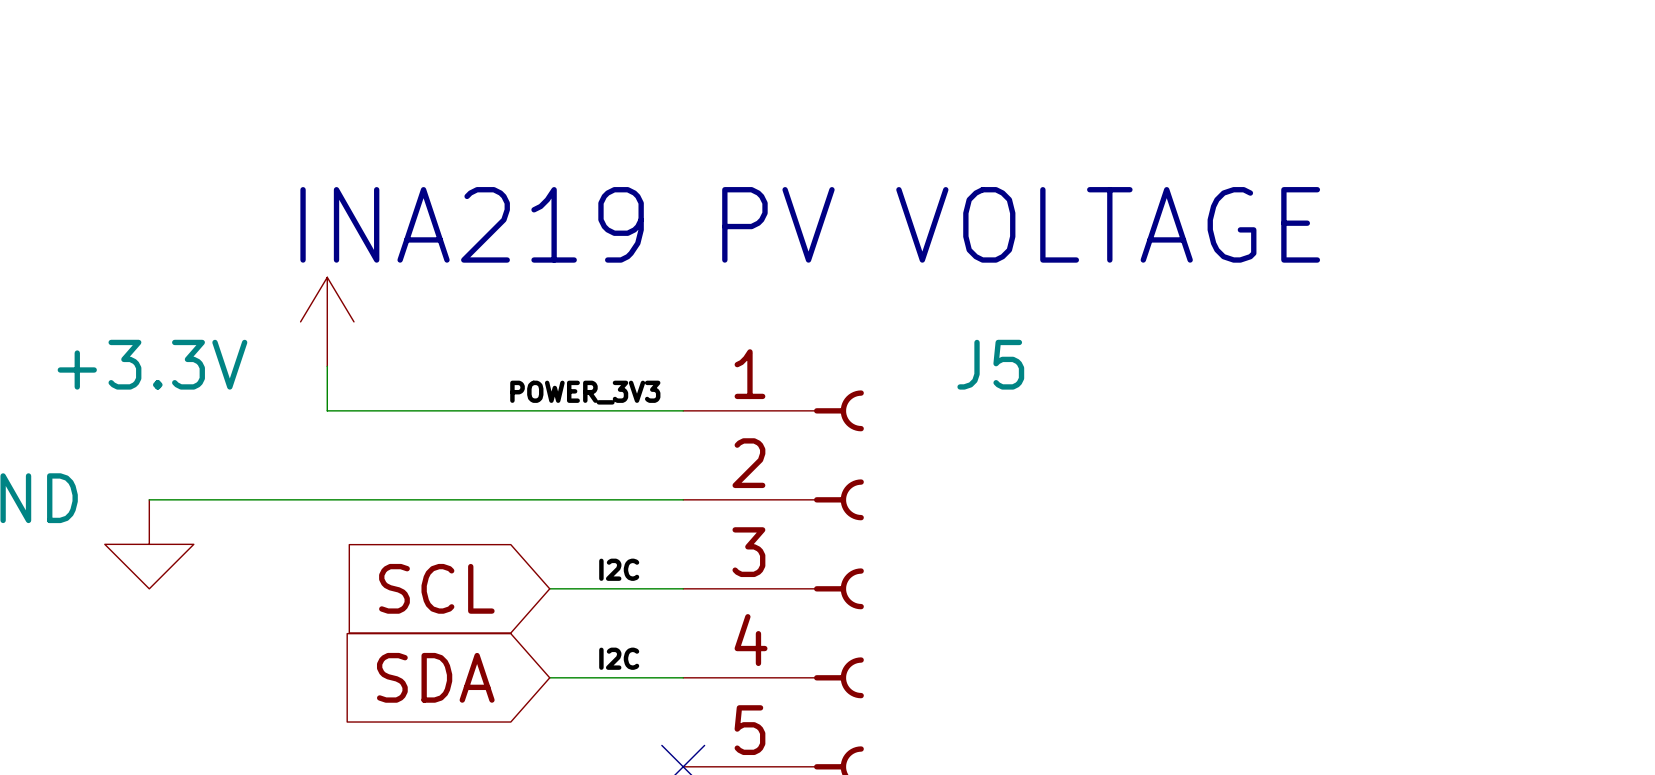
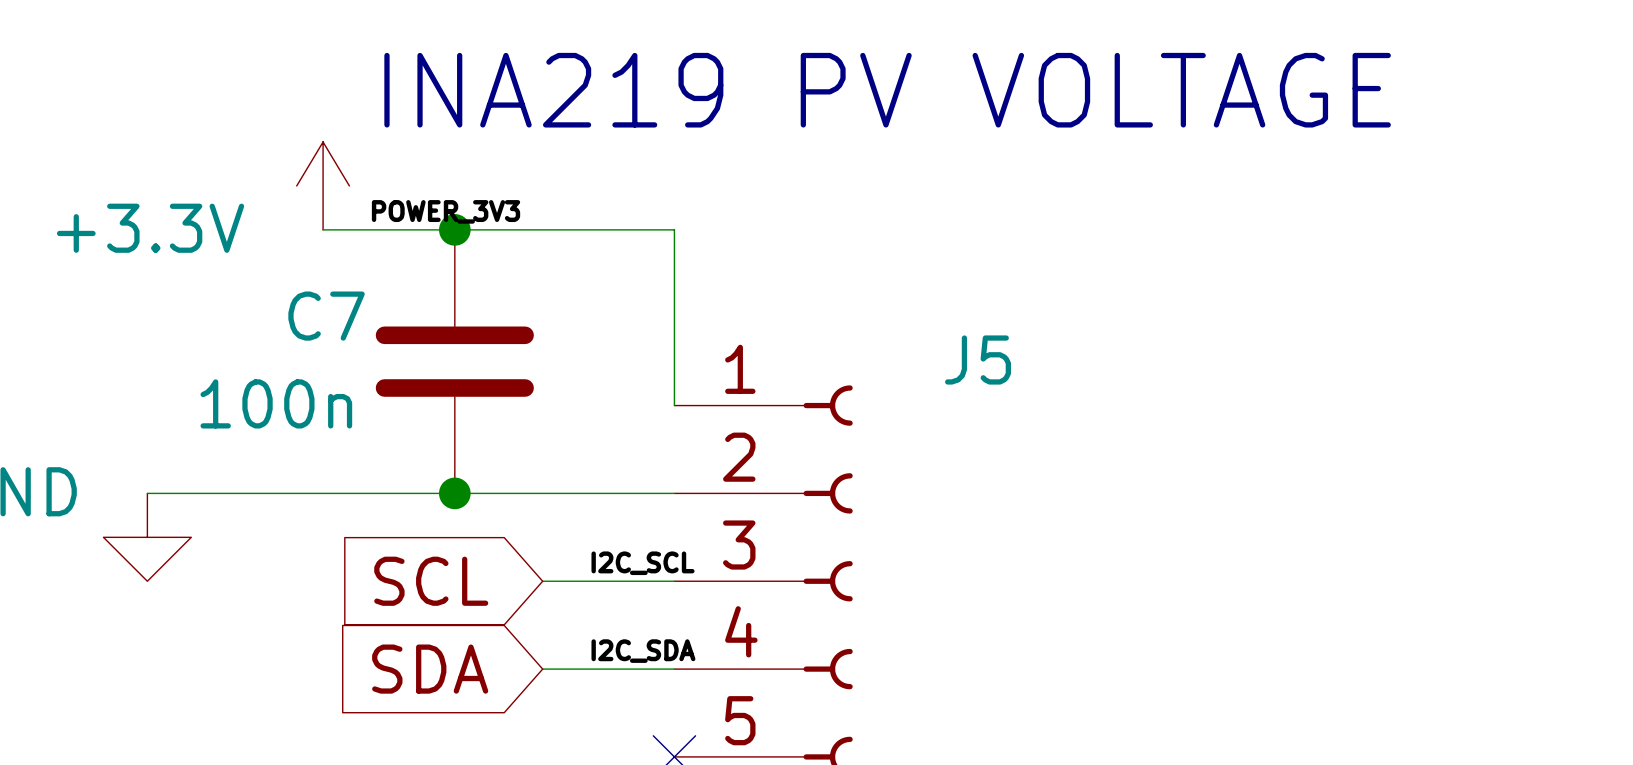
text position: INA219 PV VOLTAGE (810, 224) -> INA219 PV VOLTAGE (887, 90)
junction: none -> (454, 229)
power symbol position: +3.3V (327, 321) -> +3.3V (323, 185)
wire: (327, 366) (327, 410) (683, 410) -> (323, 229) (674, 229) (674, 405)
C7: none -> 100n (454, 361)
label position: POWER_3V3 (585, 392) -> POWER_3V3 (446, 211)
junction: none -> (454, 493)
label: I2C (619, 569) -> I2C_SCL (643, 563)
label: I2C (619, 658) -> I2C_SDA (643, 651)

